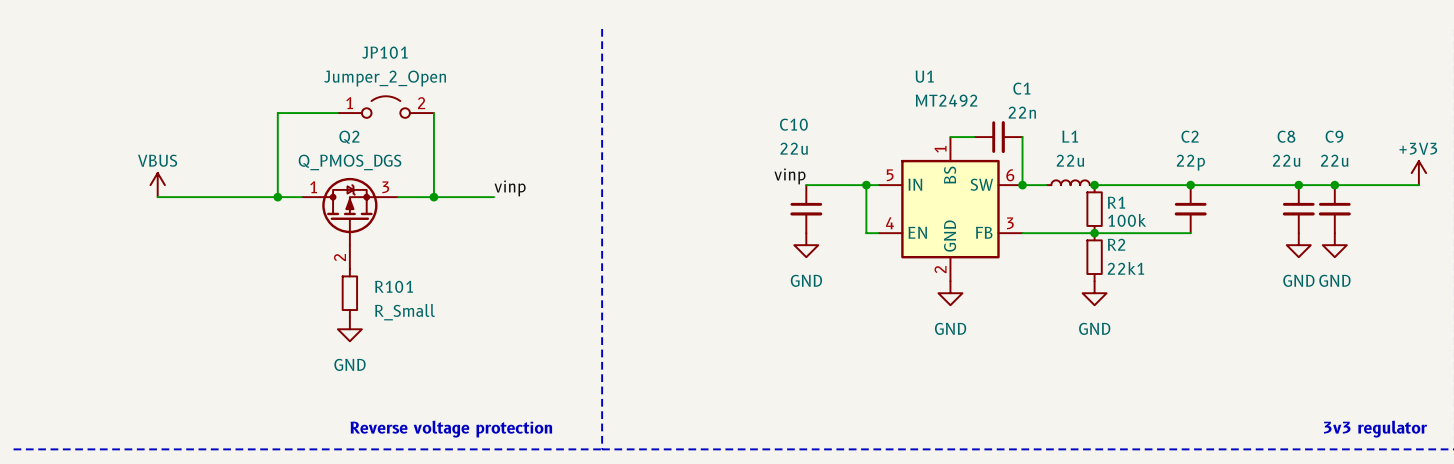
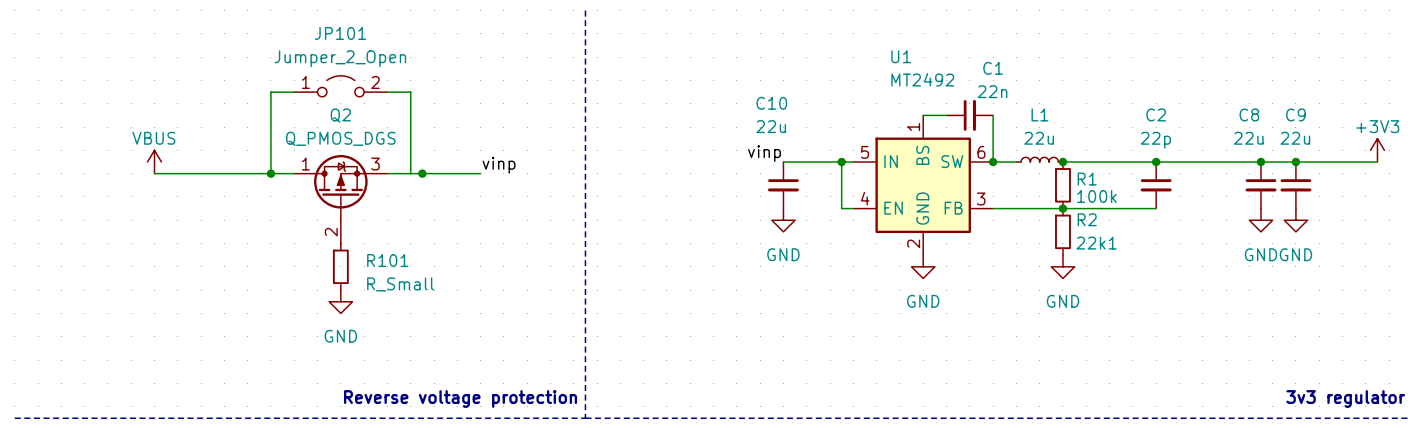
JP101 position: (385, 107) -> (340, 86)
wire: none -> (387, 92) (410, 92) (410, 173)
wire: (433, 113) (433, 197) -> none

